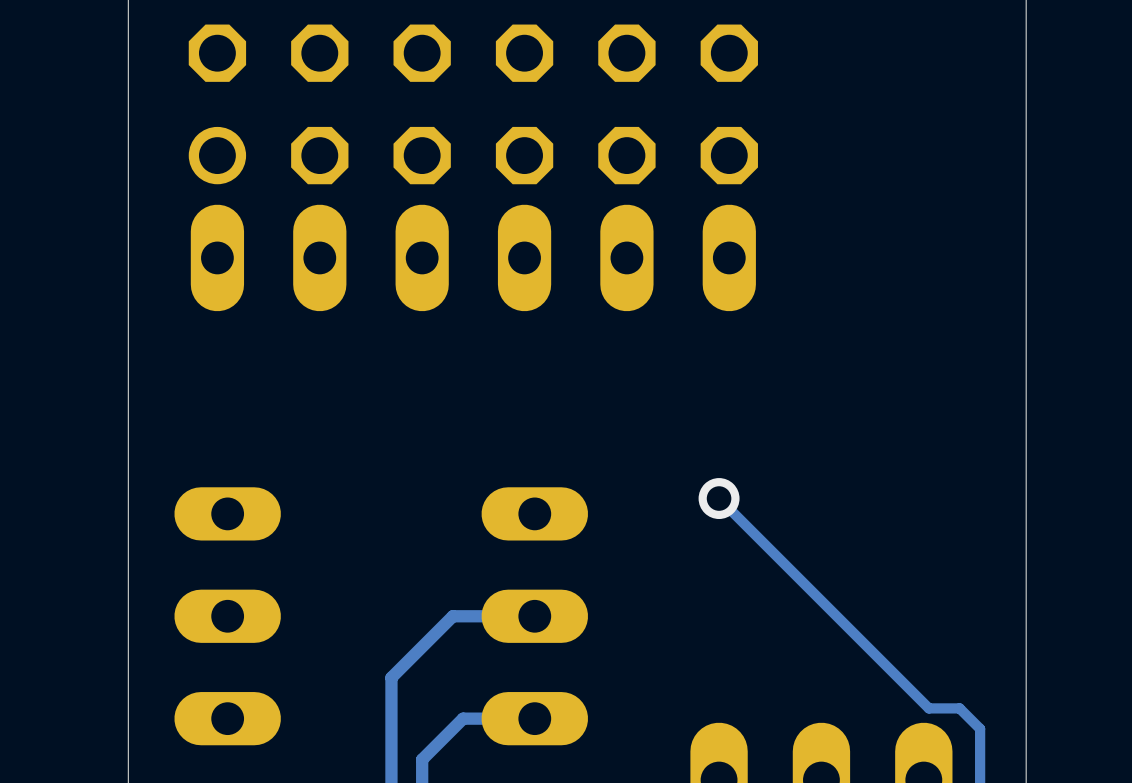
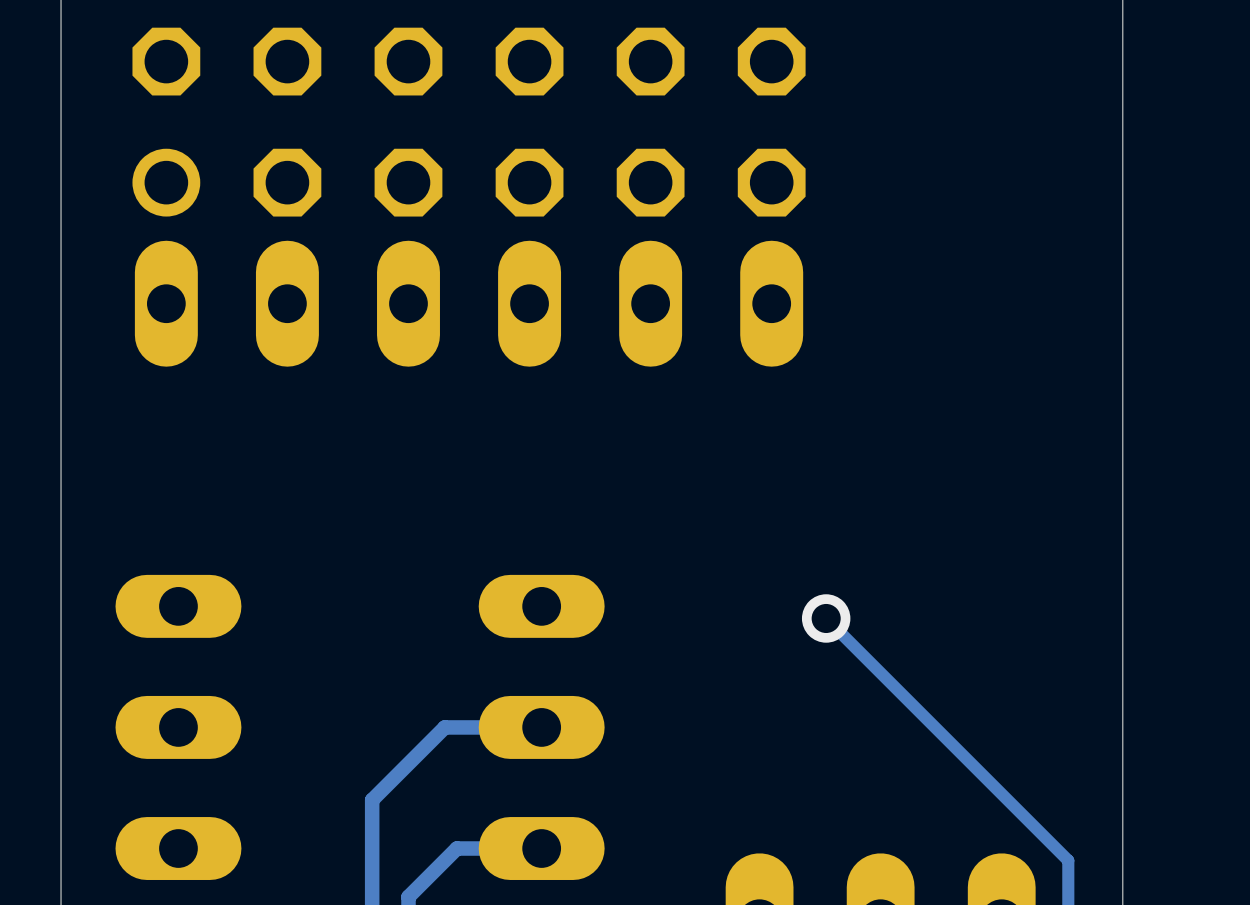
track: (719, 498) (928, 708) (959, 708) -> (826, 618) (1044, 836)
via position: (719, 498) -> (826, 618)

